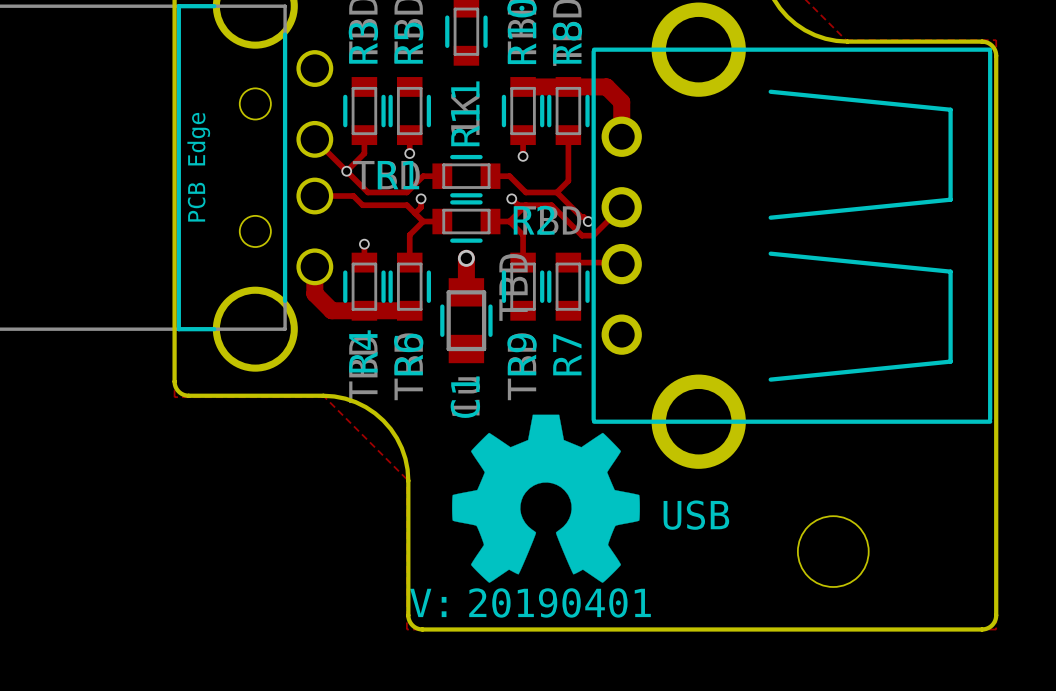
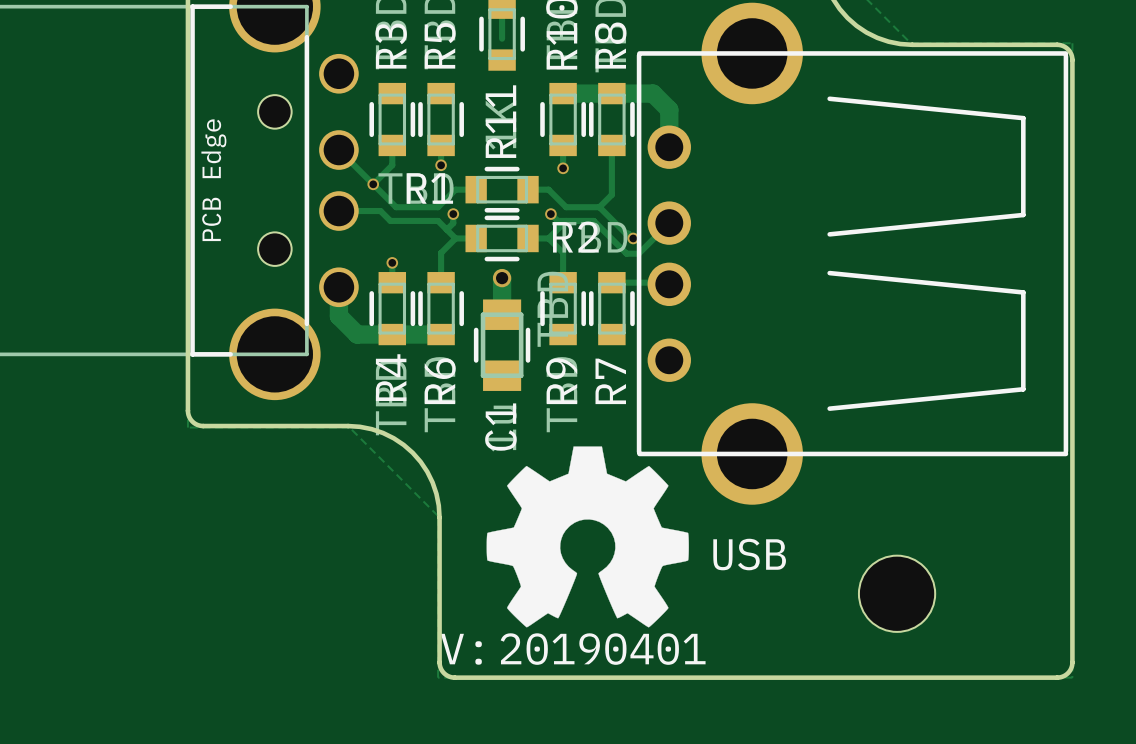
track: none -> (502, 6) (502, 38)

